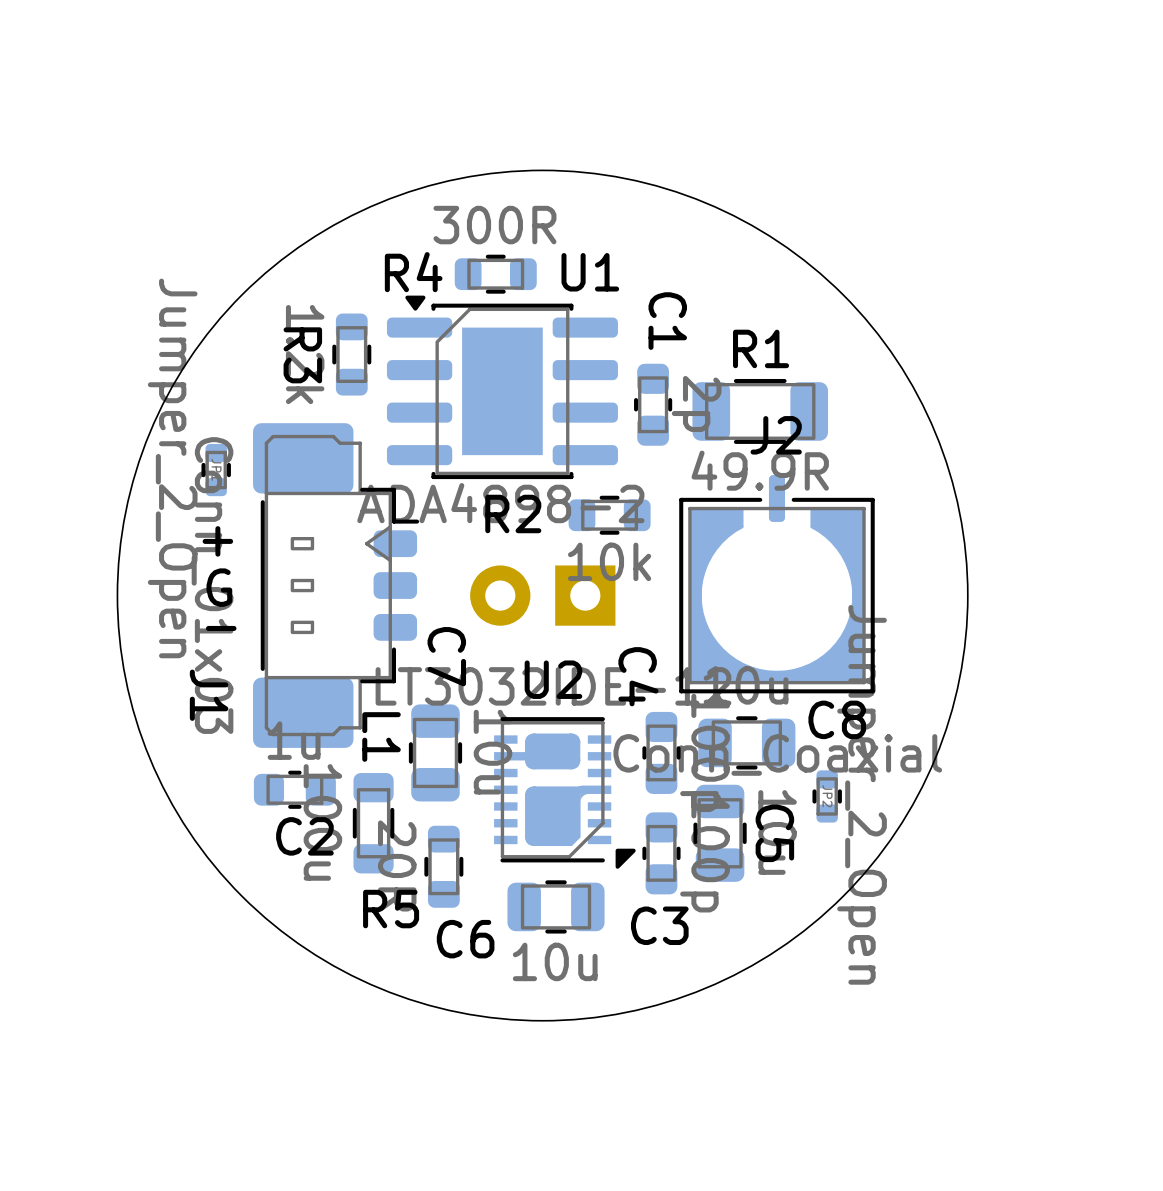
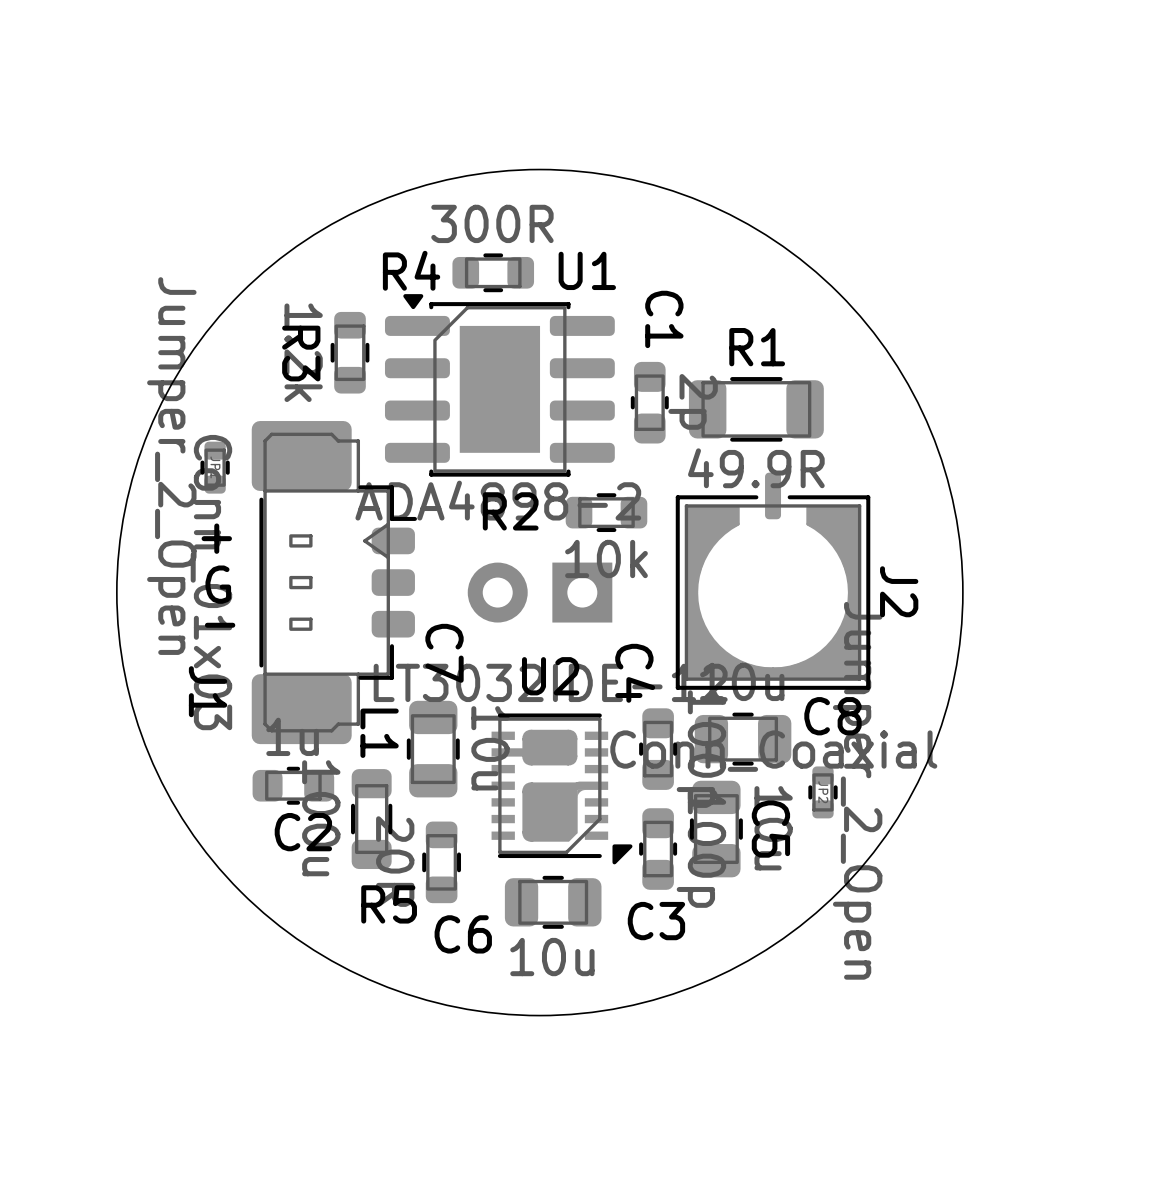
J2 name rotation: 0° (776, 435) -> 90° clockwise (899, 591)
J2 name position: J2 (776, 435) -> J2 (899, 591)

